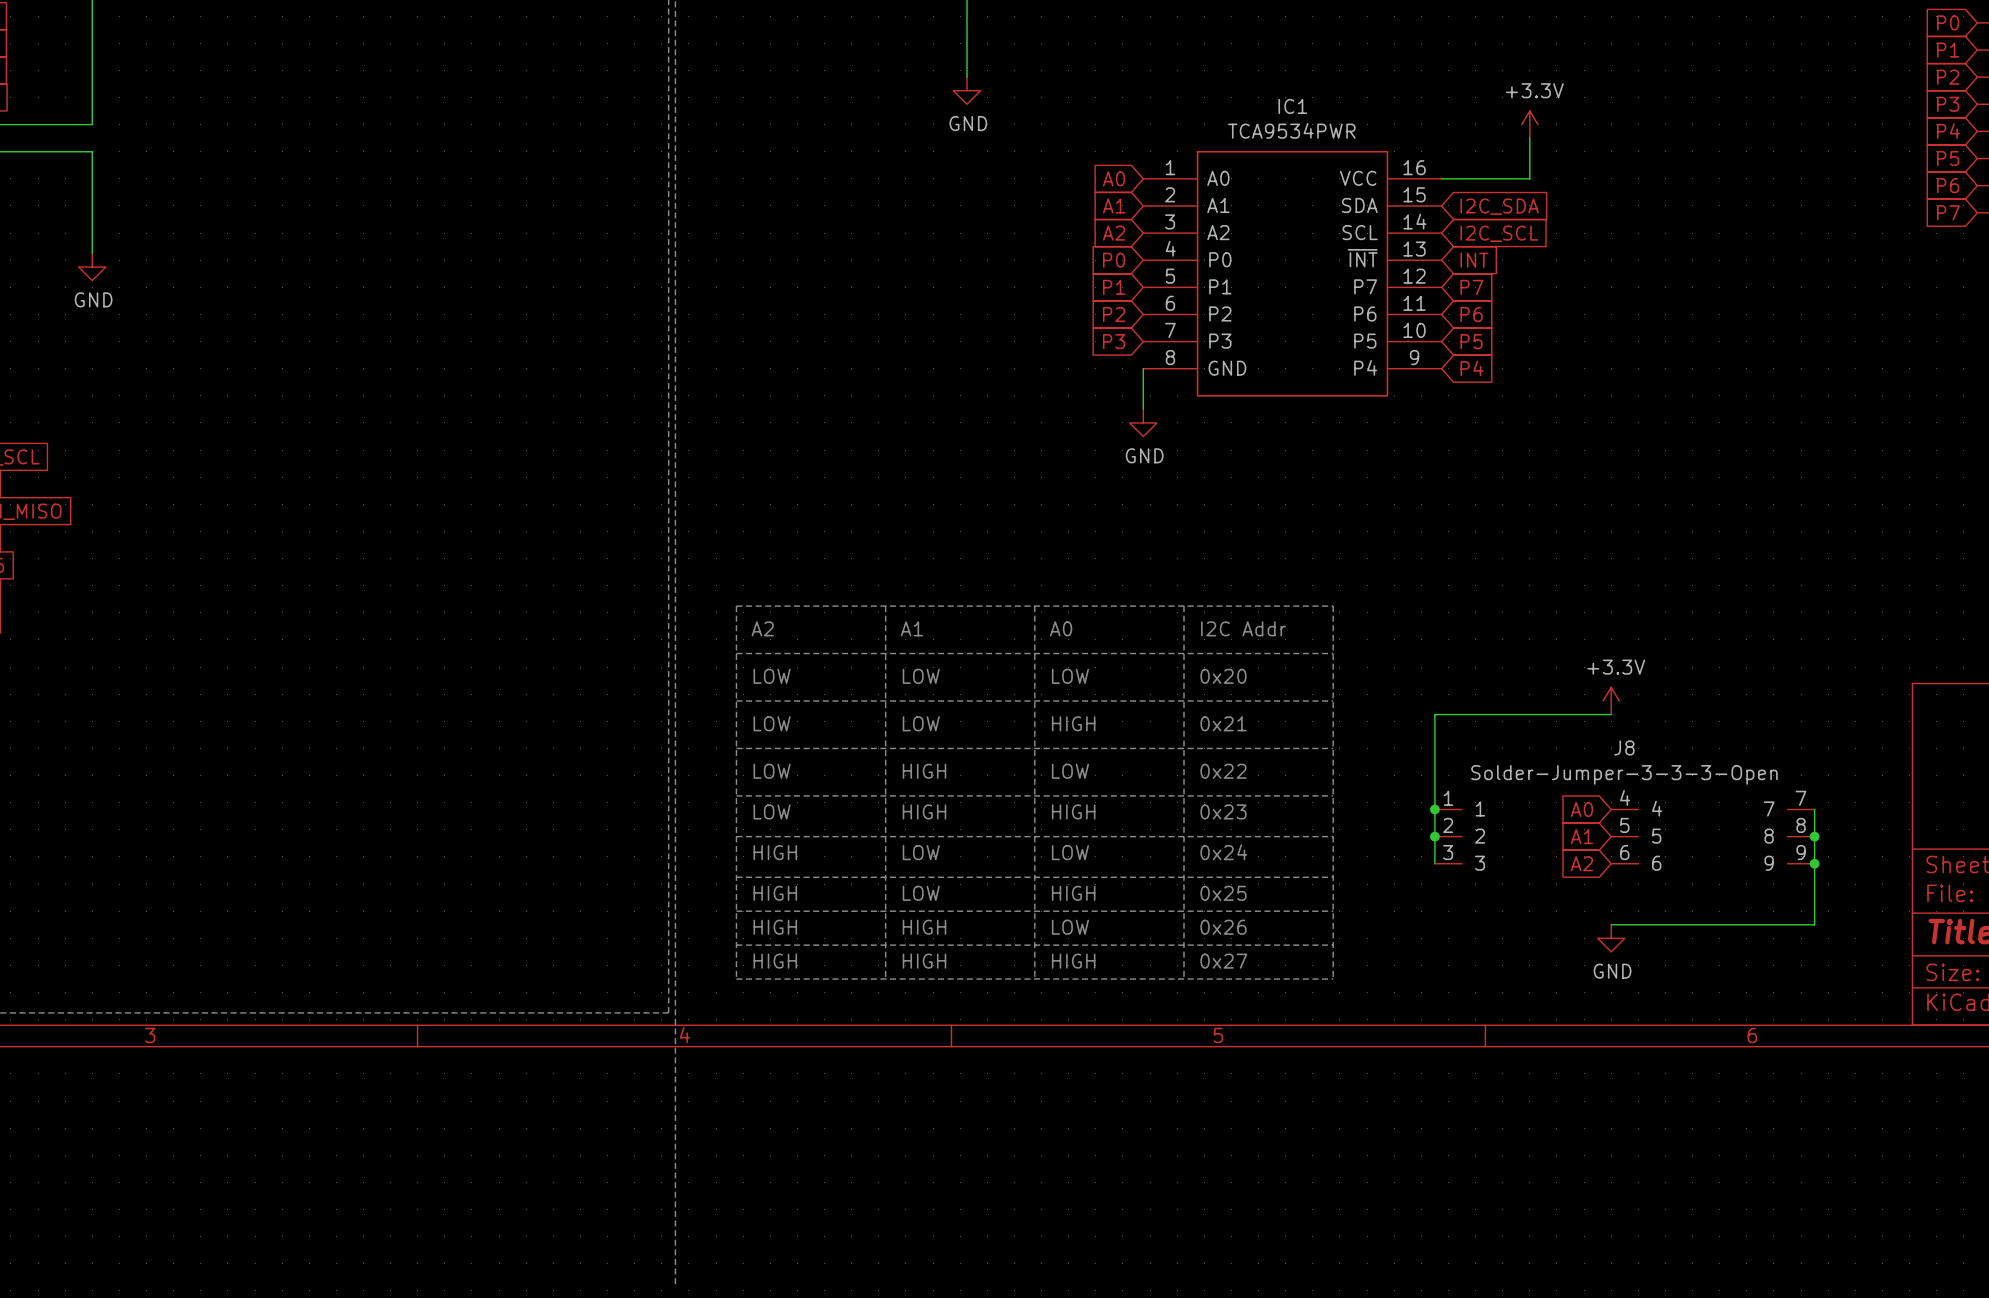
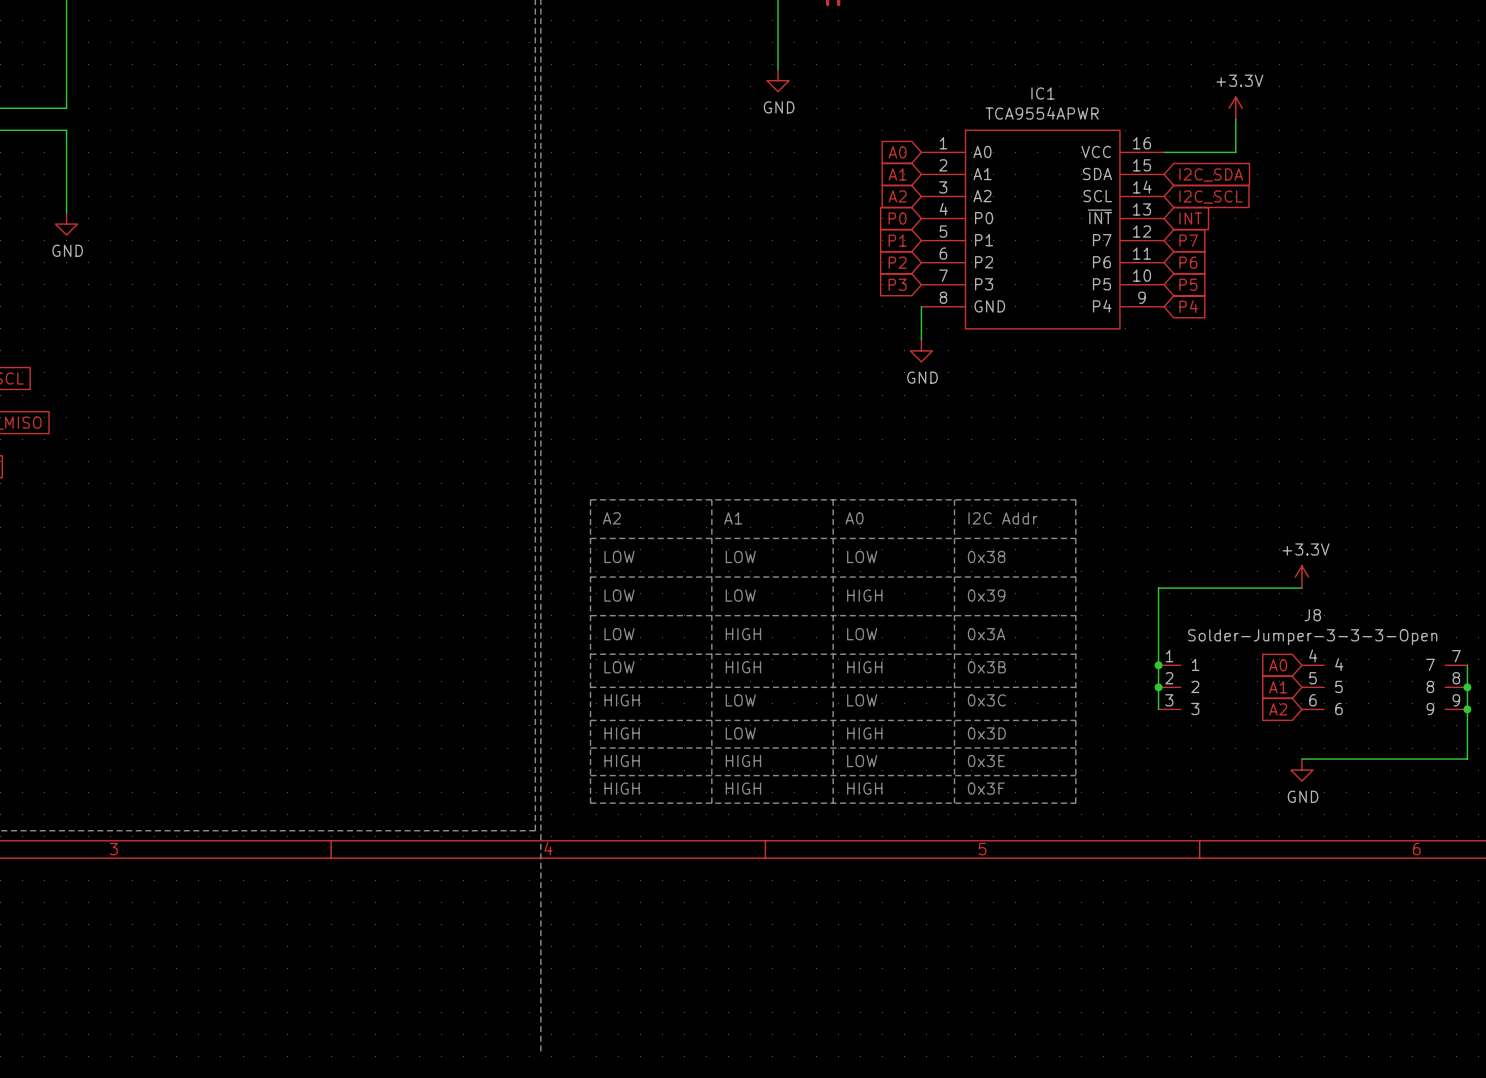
IC1 value: TCA9534PWR (1291, 130) -> TCA9554APWR (1042, 113)
text: 0x20 (1223, 676) -> 0x38 (986, 556)
text: 0x21 (1223, 723) -> 0x39 (986, 595)
text: 0x22 (1223, 771) -> 0x3A (986, 634)
text: 0x23 (1223, 811) -> 0x3B (986, 667)
text: 0x24 (1223, 852) -> 0x3C (986, 700)
text: 0x25 (1223, 893) -> 0x3D (986, 733)
text: 0x26 (1223, 927) -> 0x3E (986, 761)
text: 0x27 (1223, 961) -> 0x3F (986, 788)

